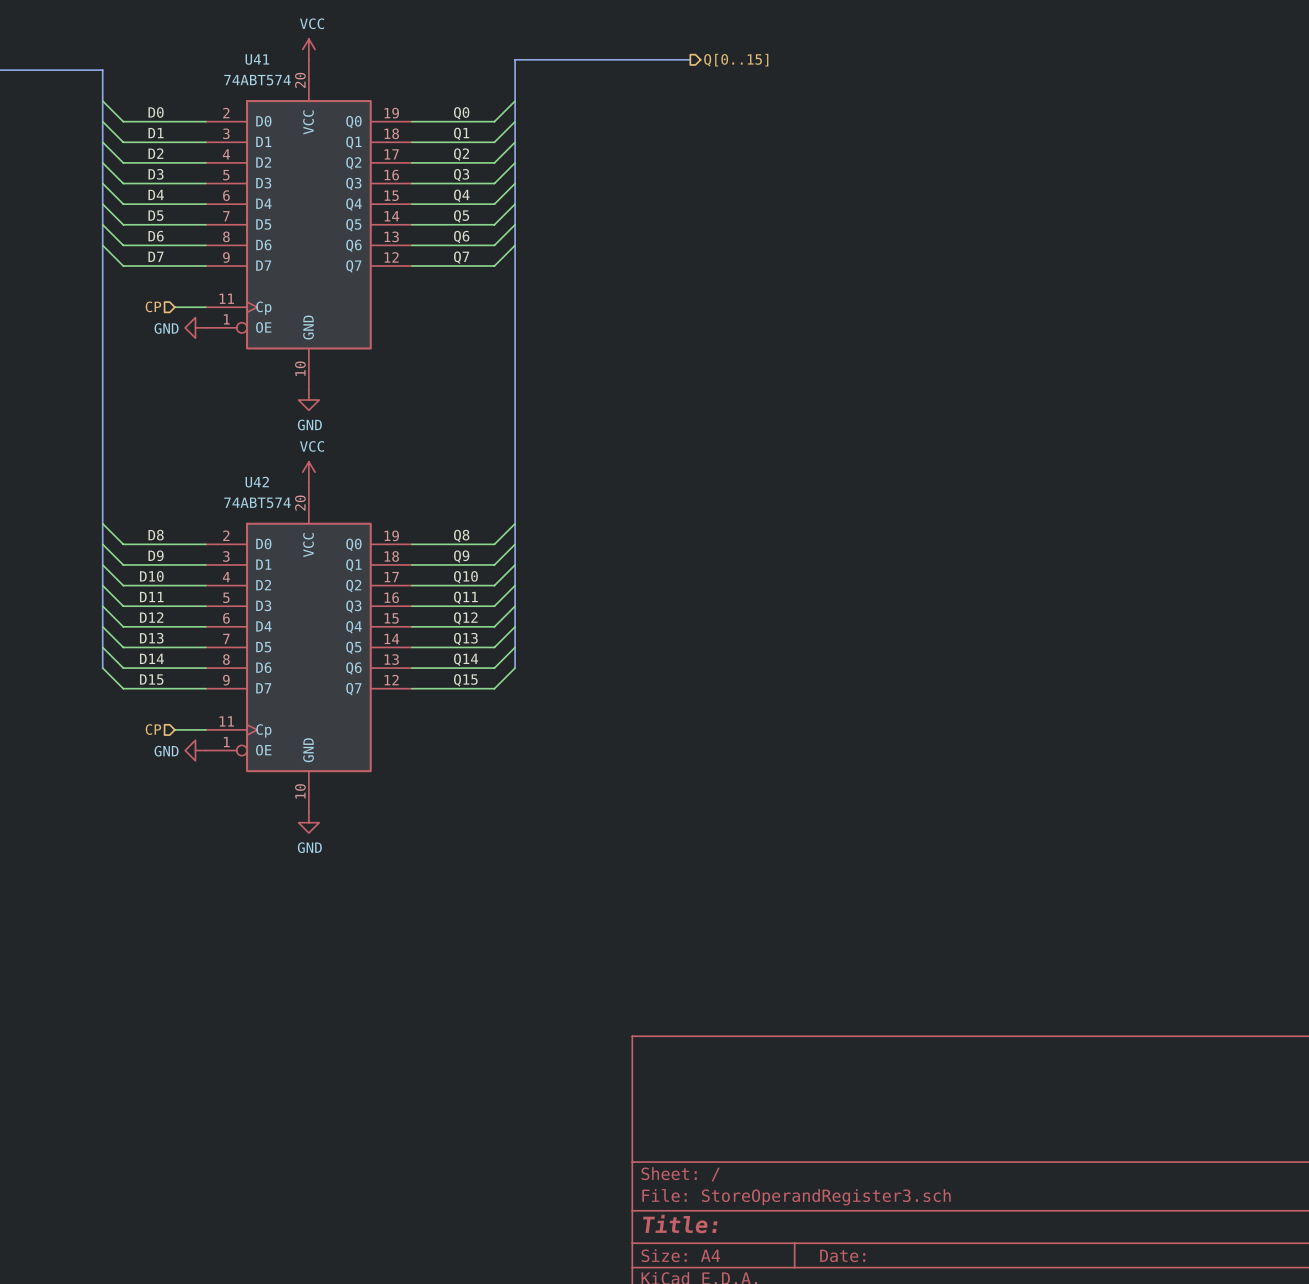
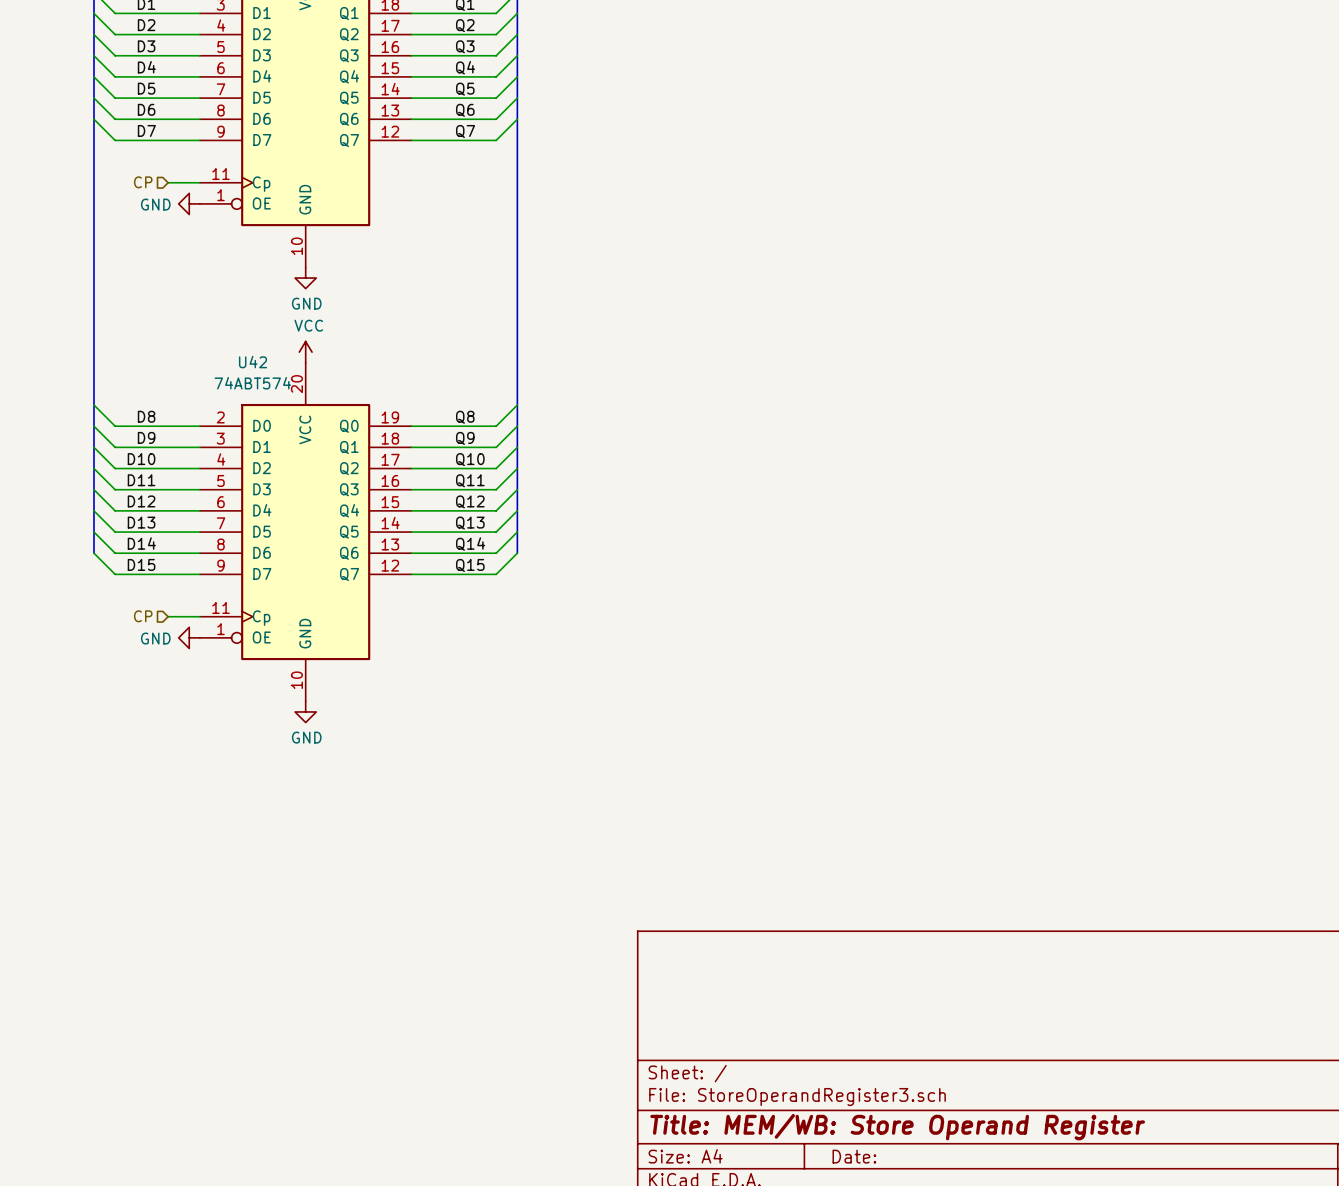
title block: Title: (680, 1224) -> Title: MEM/WB: Store Operand Register (897, 1127)

